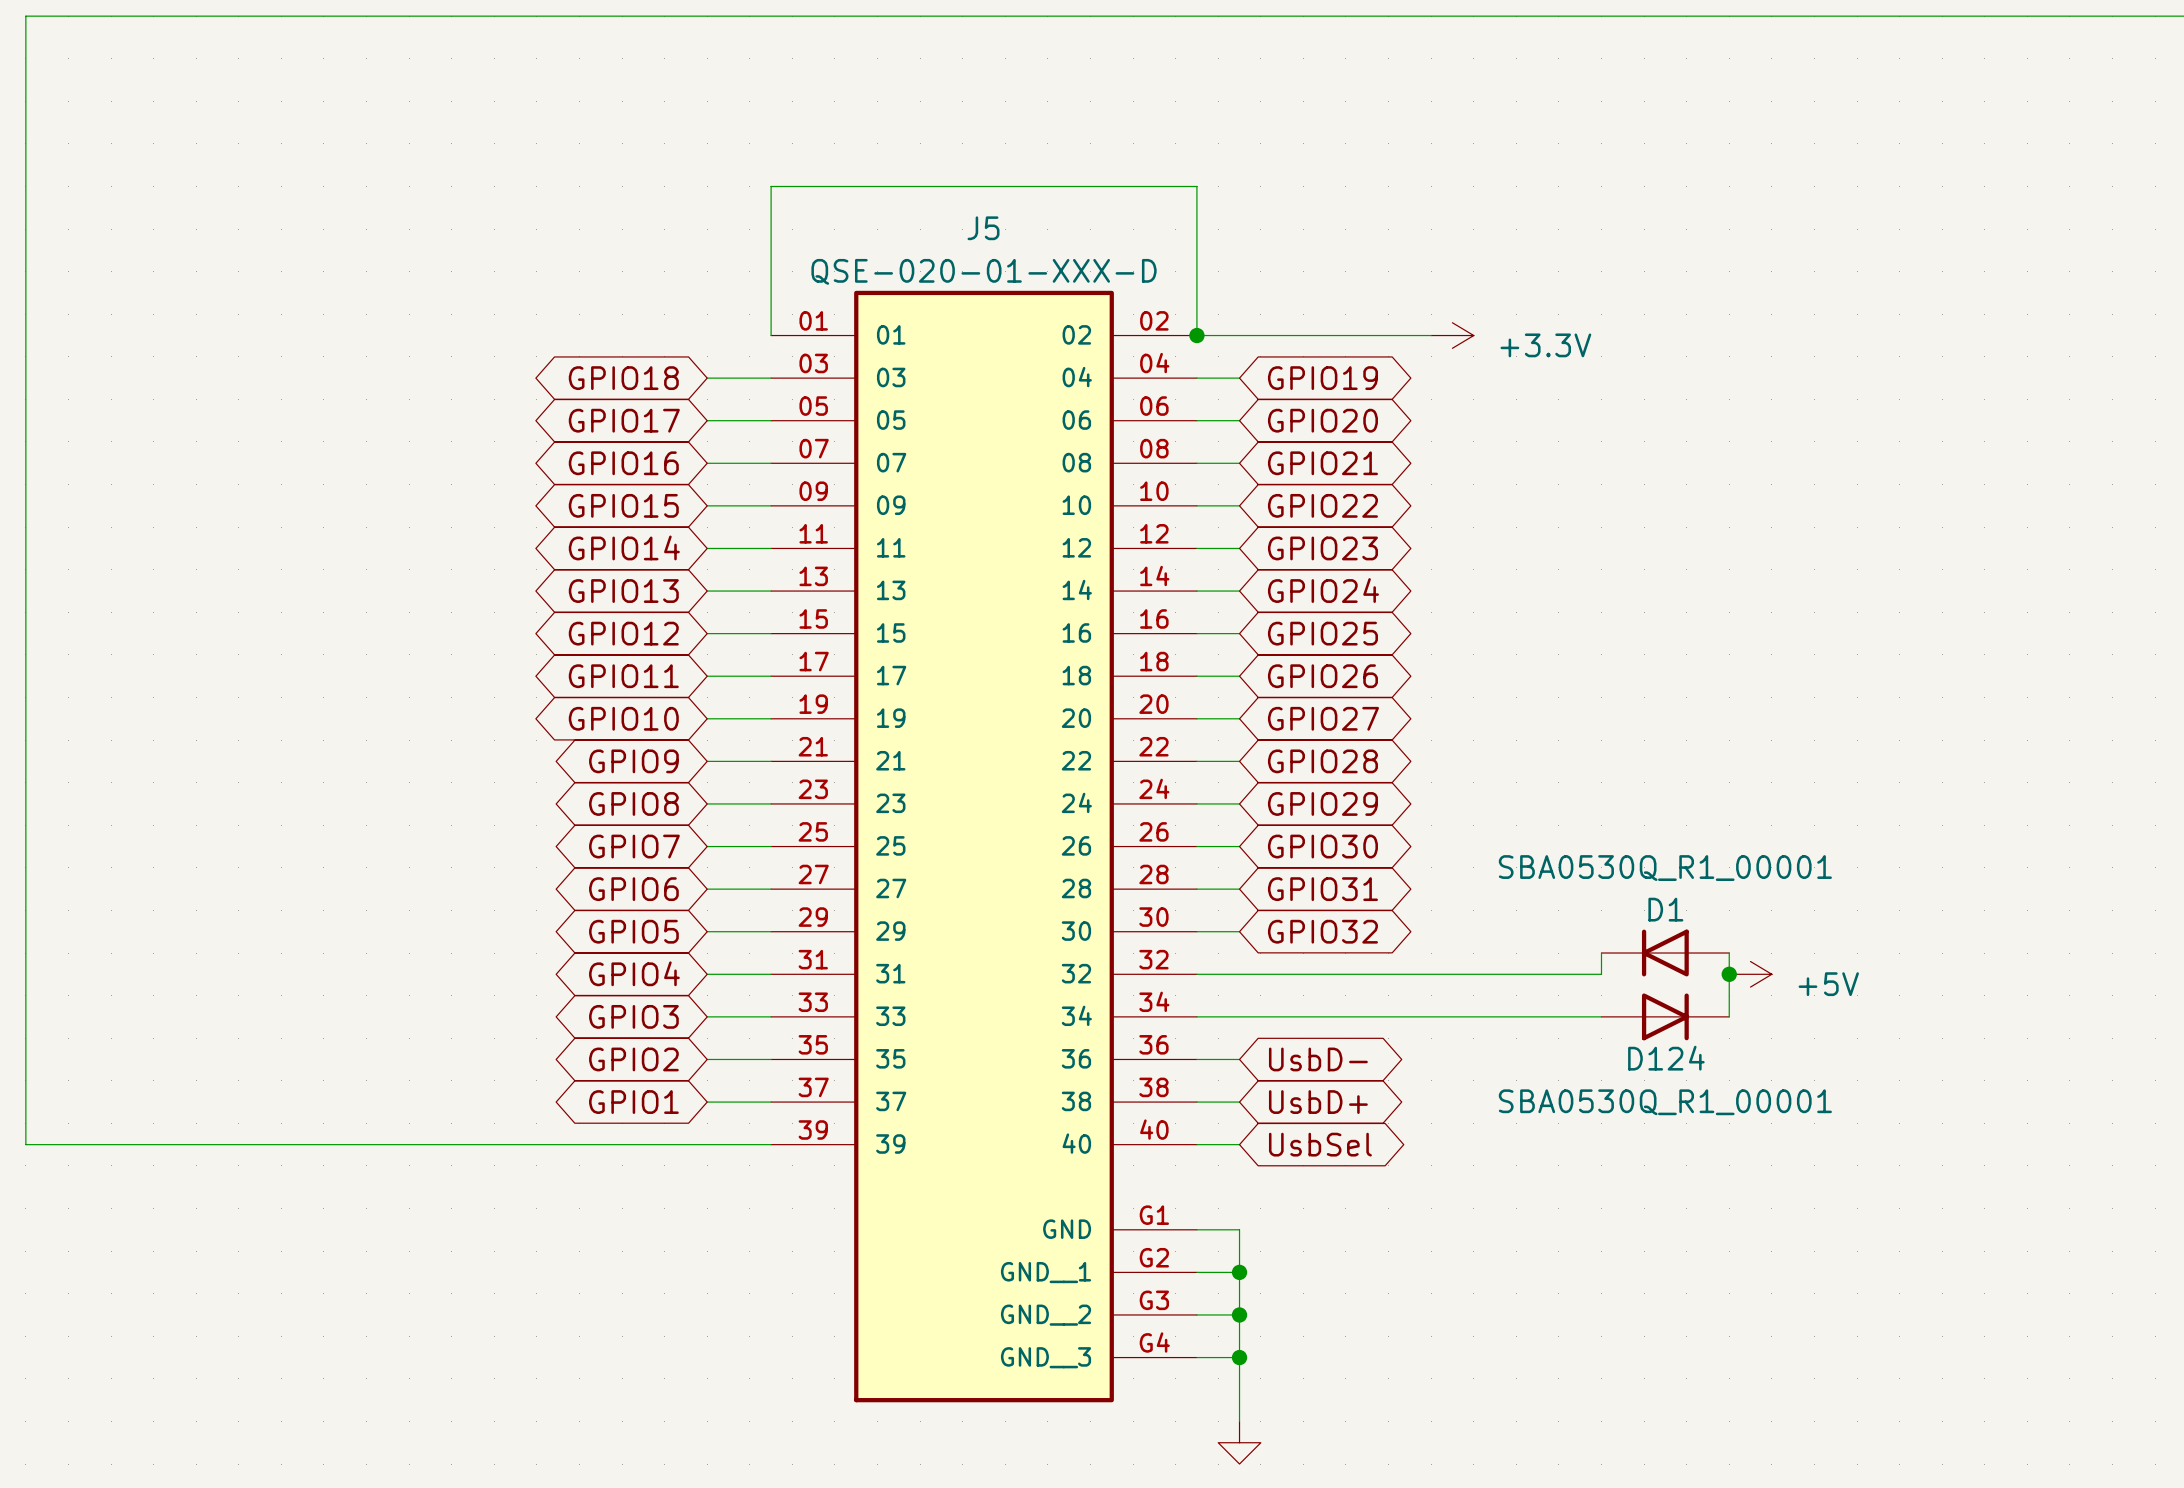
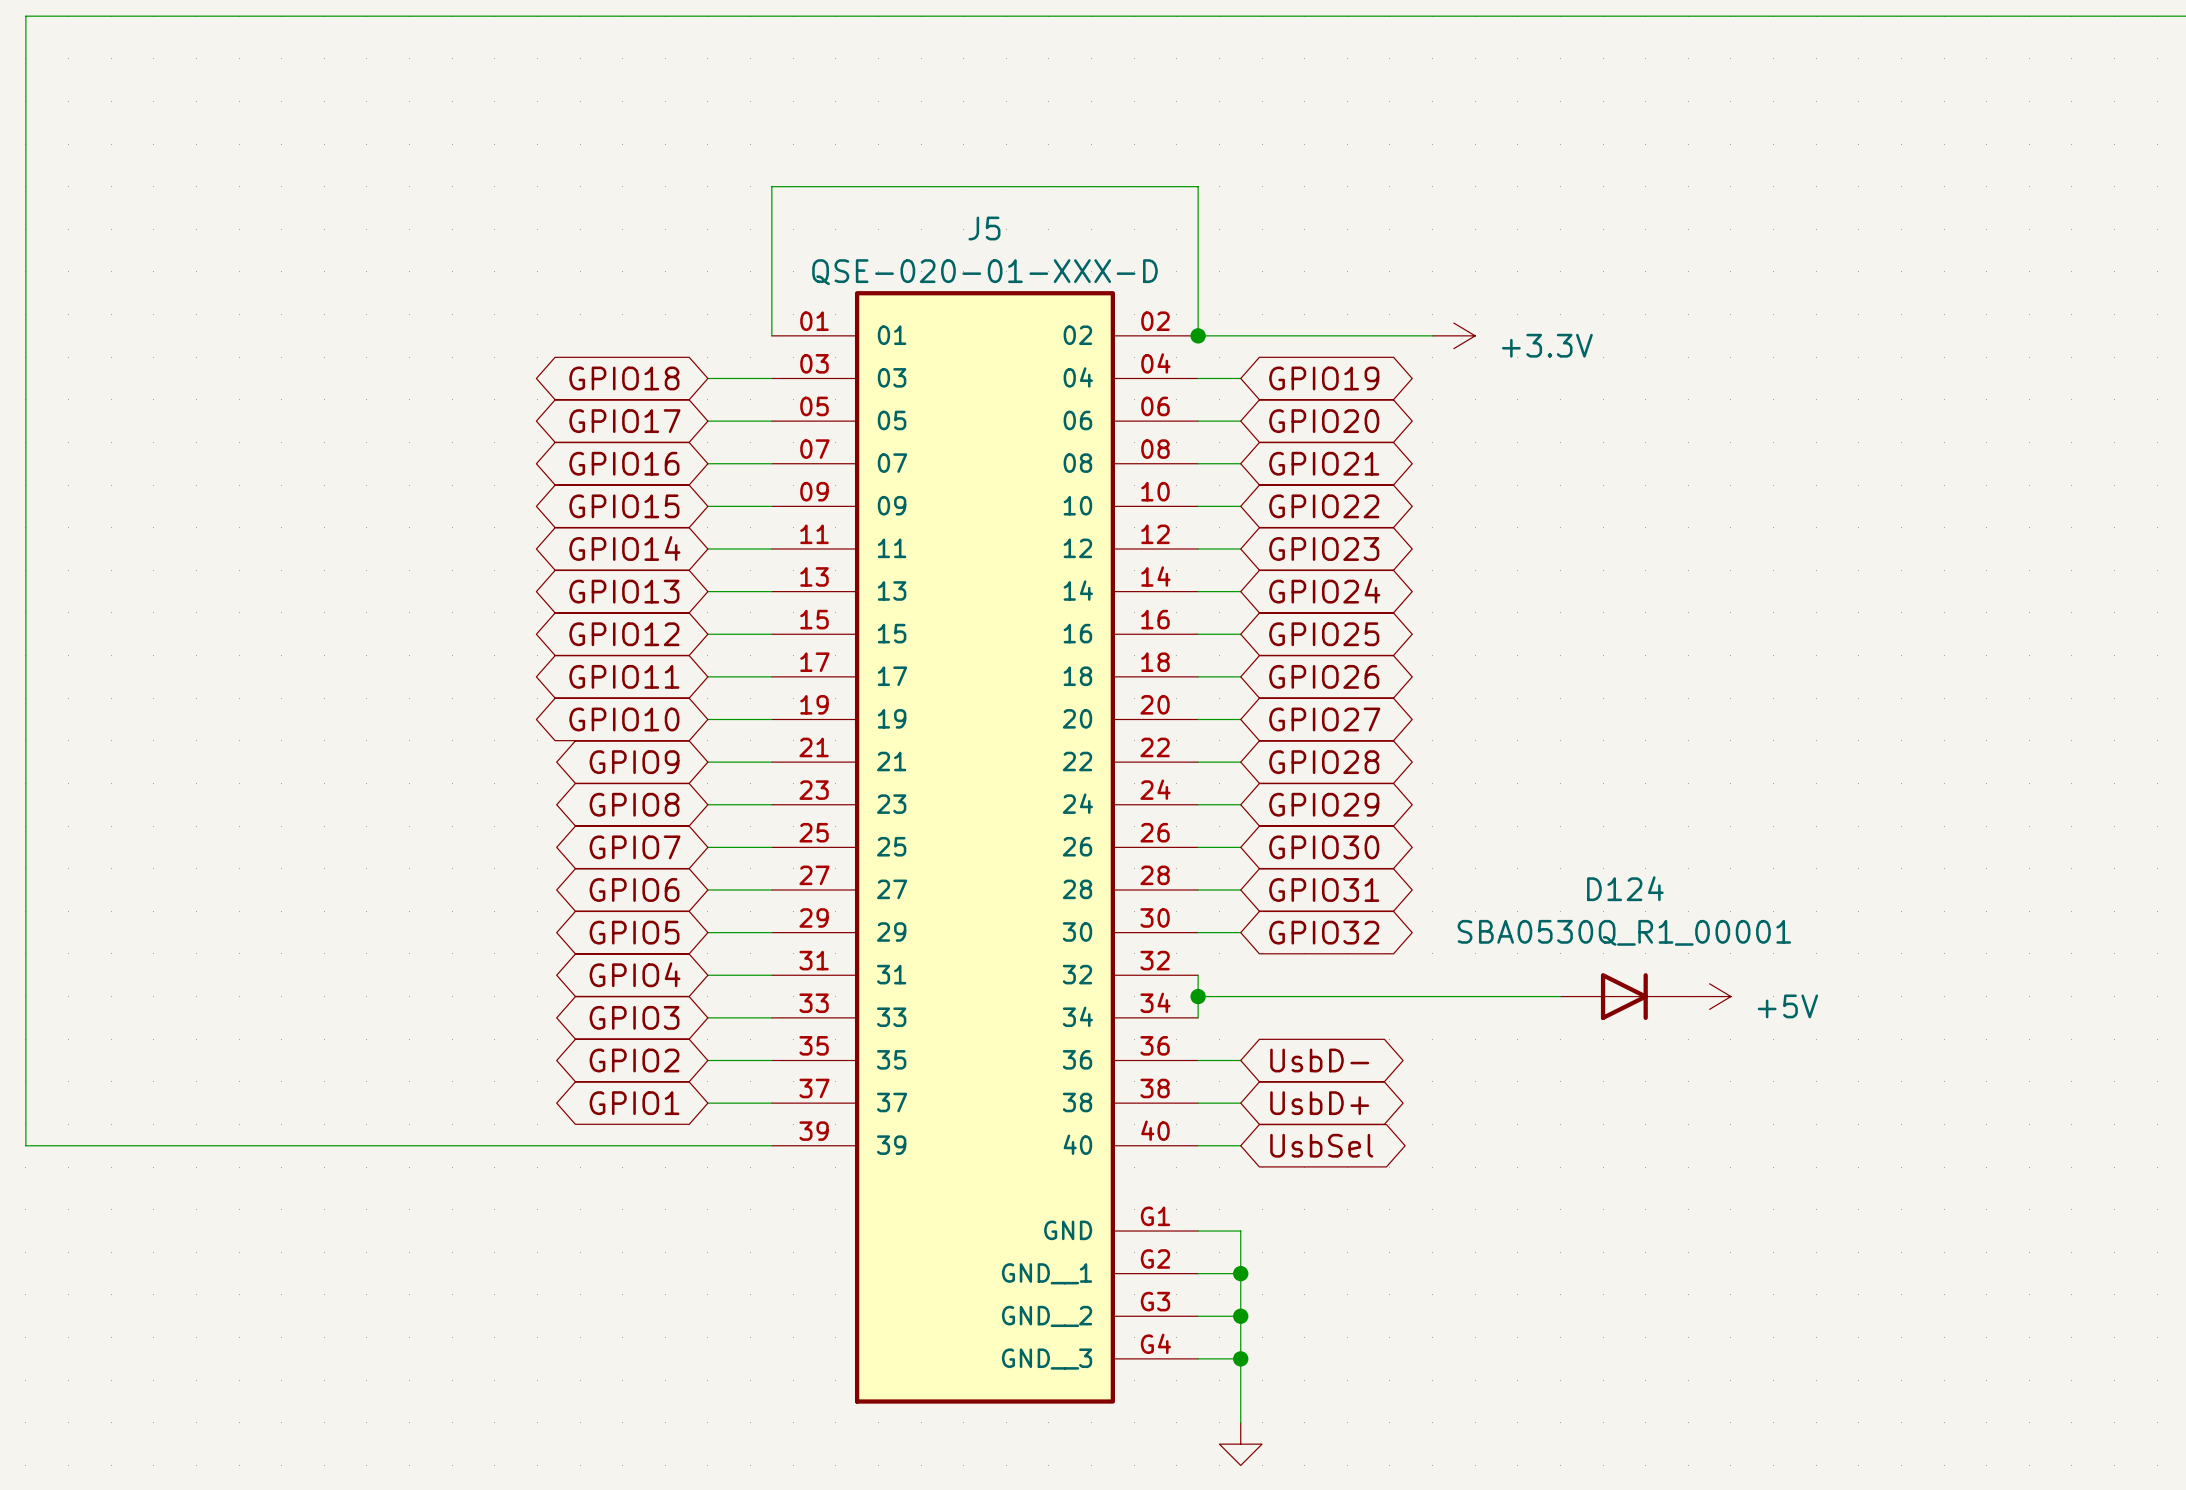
wire: (1601, 953) (1601, 974) (1196, 974) -> none
D1: SBA0530Q_R1_00001 (1665, 953) -> none
wire: (1729, 953) (1729, 1016) -> none
junction: (1729, 974) -> none
power symbol position: +5V (1750, 974) -> +5V (1709, 996)
wire: none -> (1198, 996) (1560, 996)
junction: none -> (1198, 996)
wire: (1196, 1016) (1601, 1016) -> (1198, 1017) (1198, 975)
D124 position: (1665, 1016) -> (1624, 996)
D124 name position: D124 (1666, 1058) -> D124 (1625, 888)
D124 value position: SBA0530Q_R1_00001 (1665, 1102) -> SBA0530Q_R1_00001 (1624, 932)

